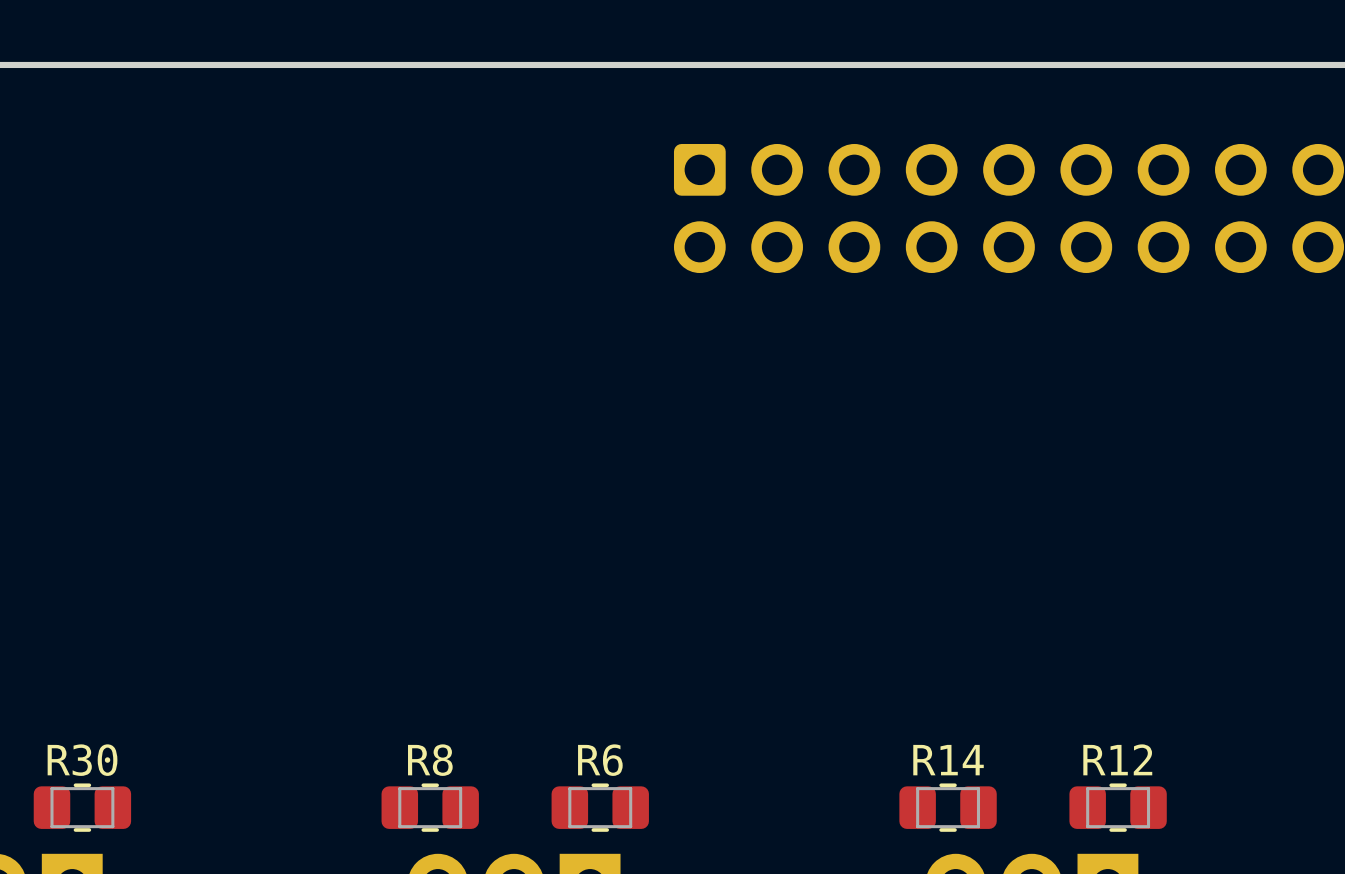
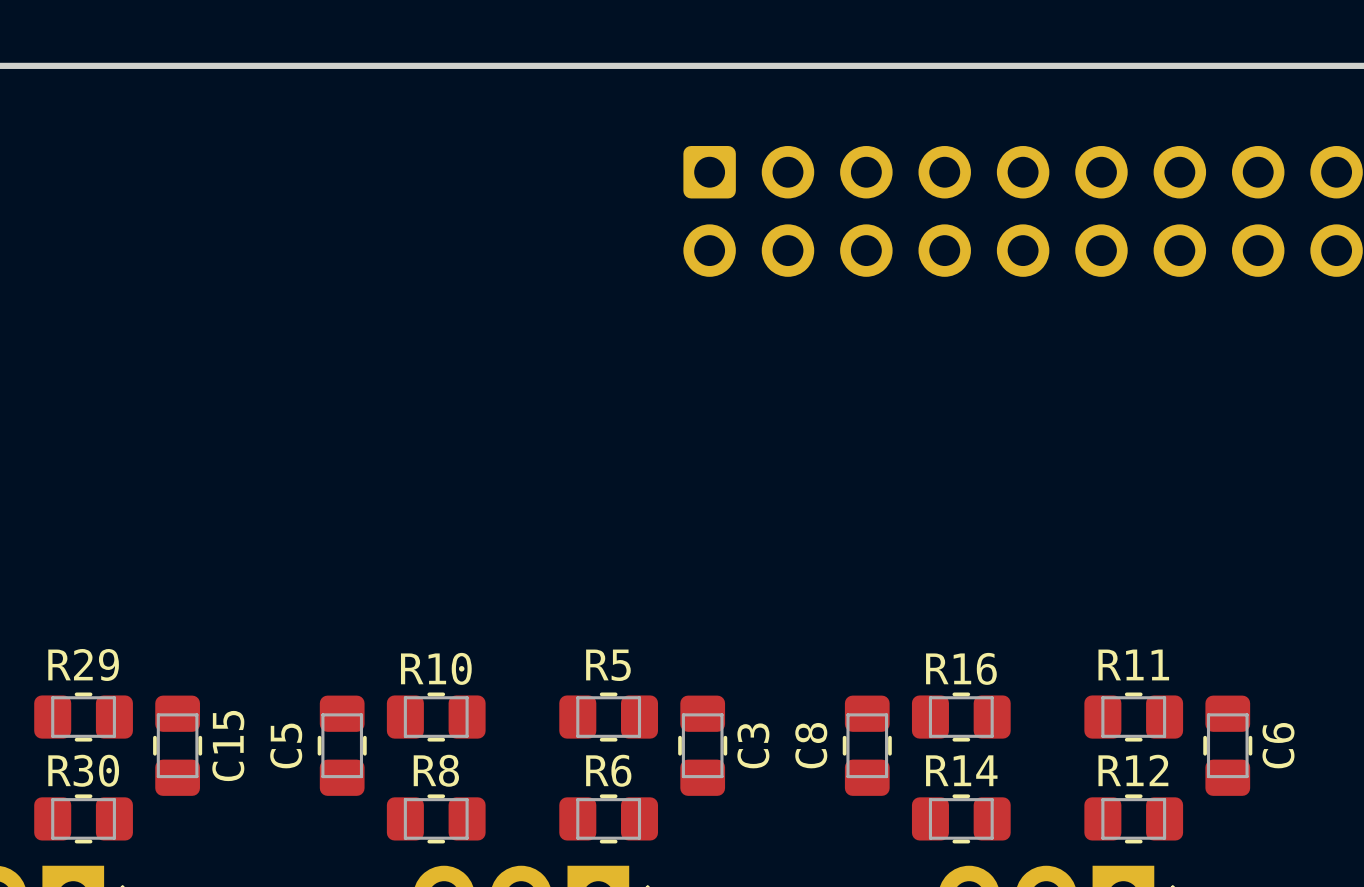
R29: none -> (83, 717)
R10: none -> (436, 717)
R5: none -> (608, 717)
R16: none -> (961, 717)
R11: none -> (1133, 717)
C15: none -> (177, 745)
C5: none -> (342, 745)
C3: none -> (702, 745)
C8: none -> (867, 745)
C6: none -> (1227, 745)

